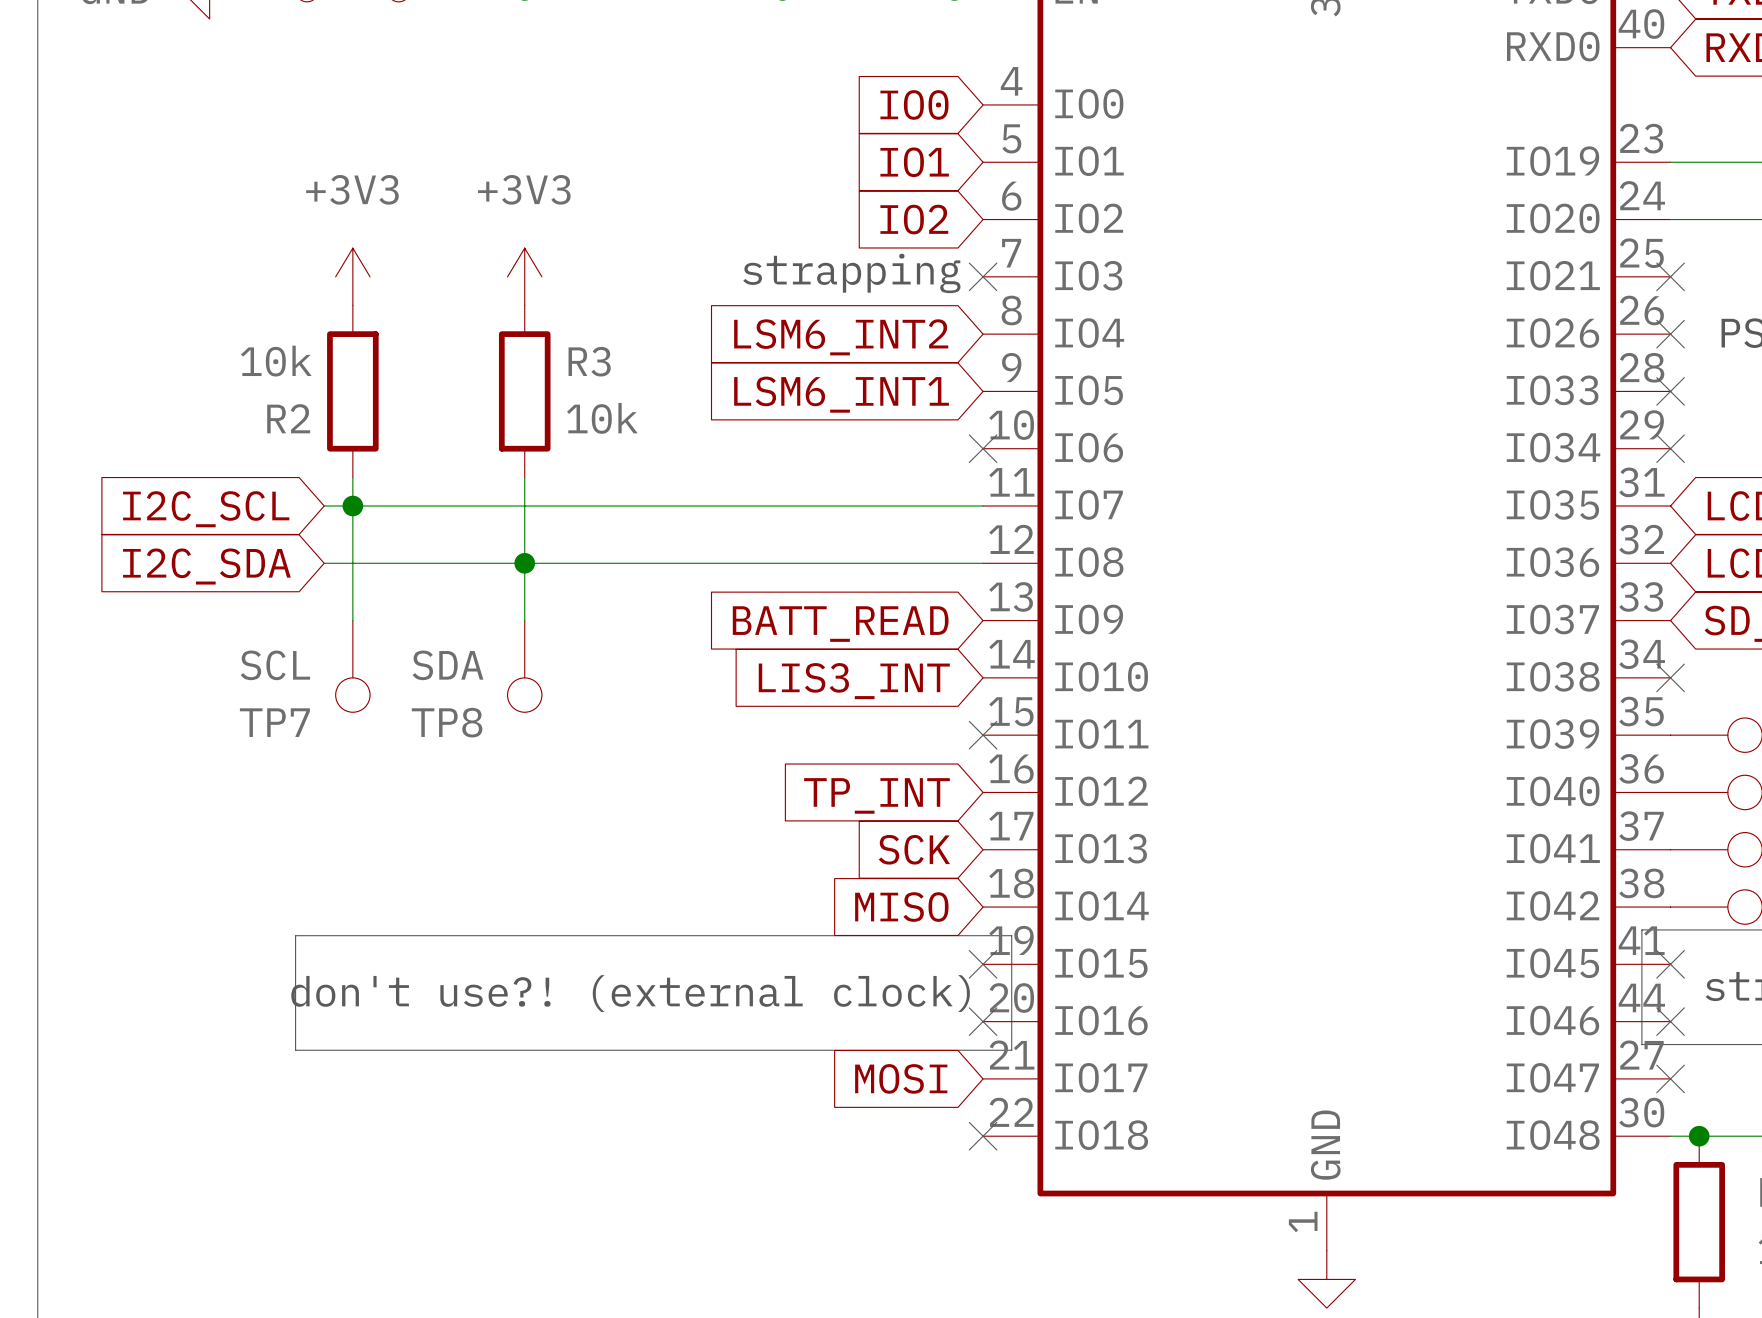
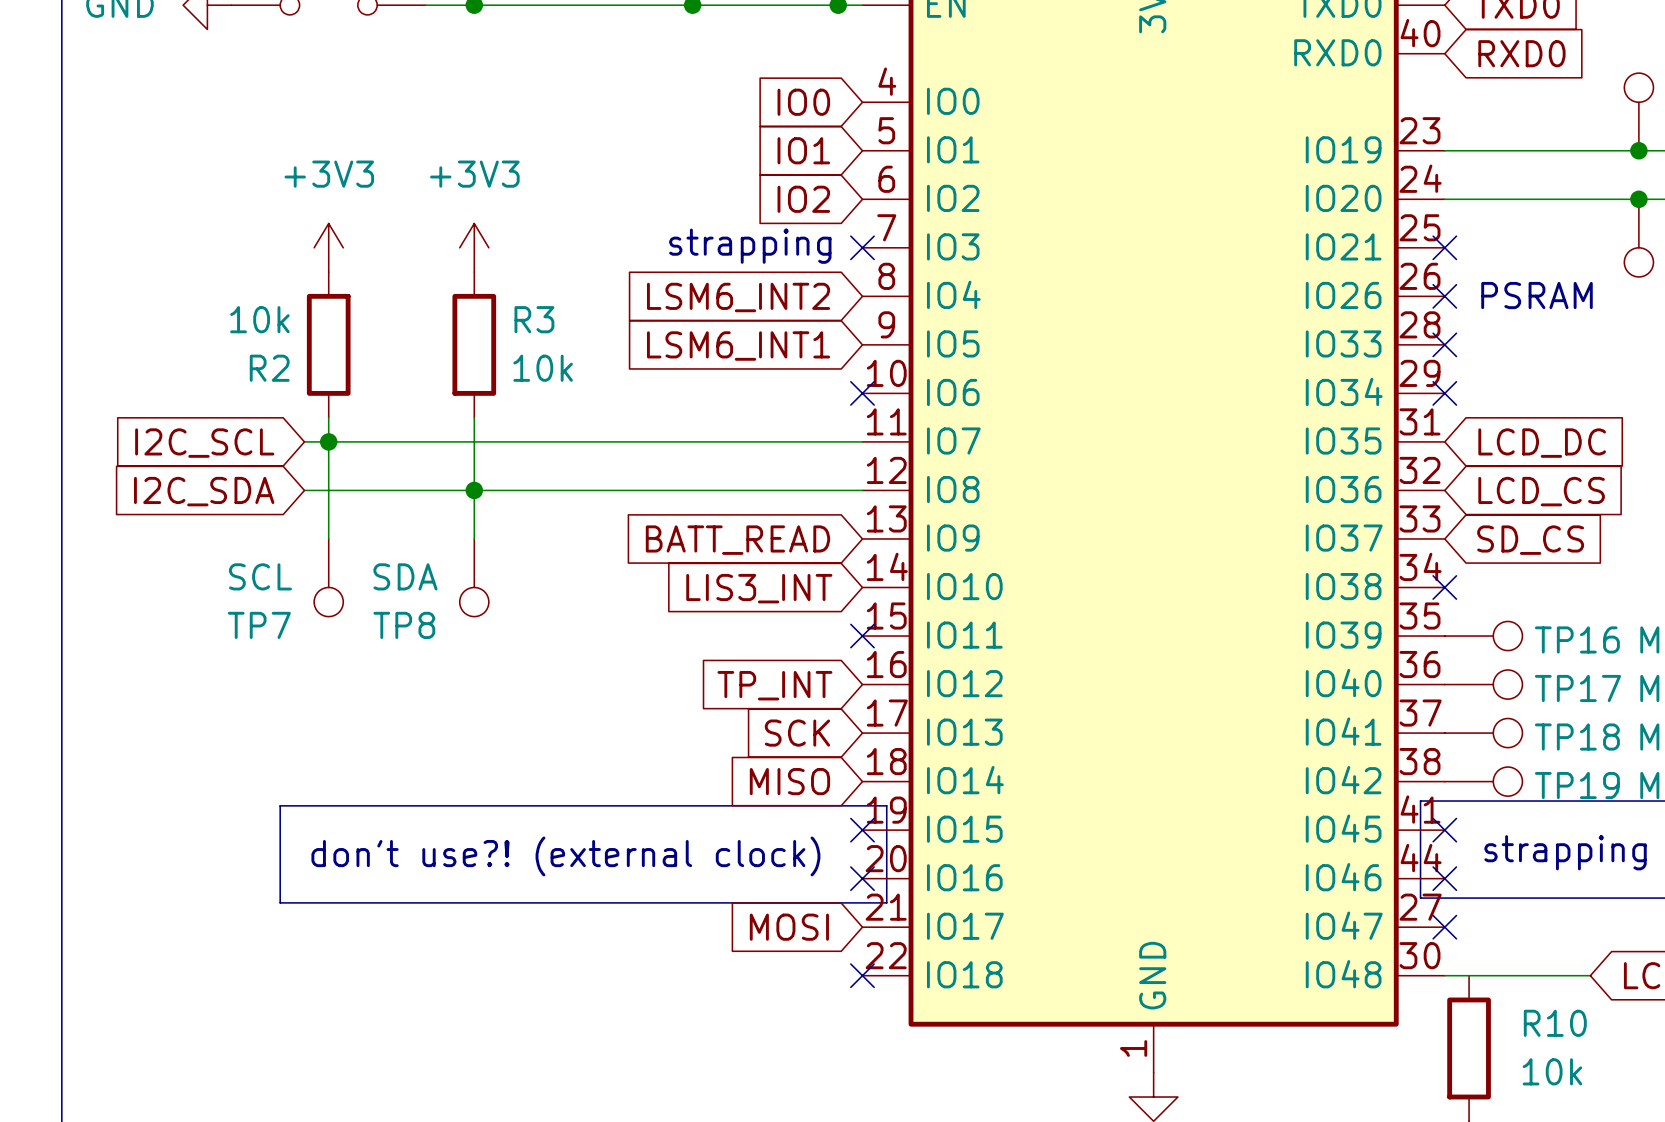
junction: (1699, 1136) -> none

